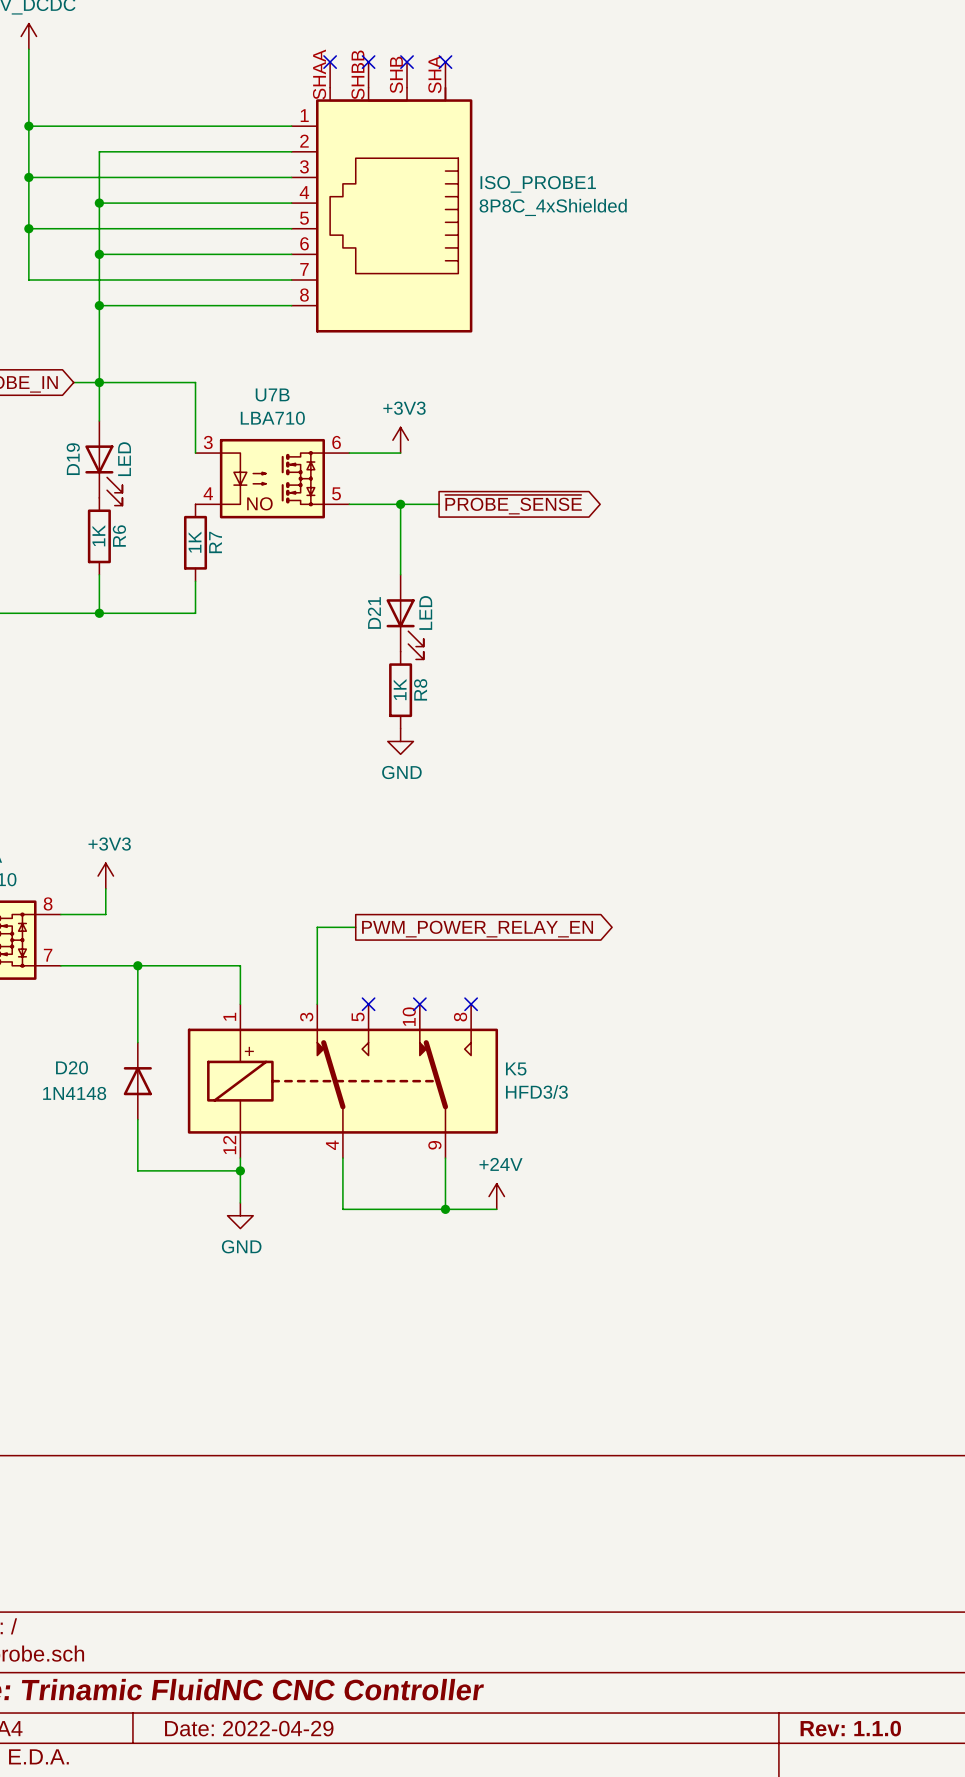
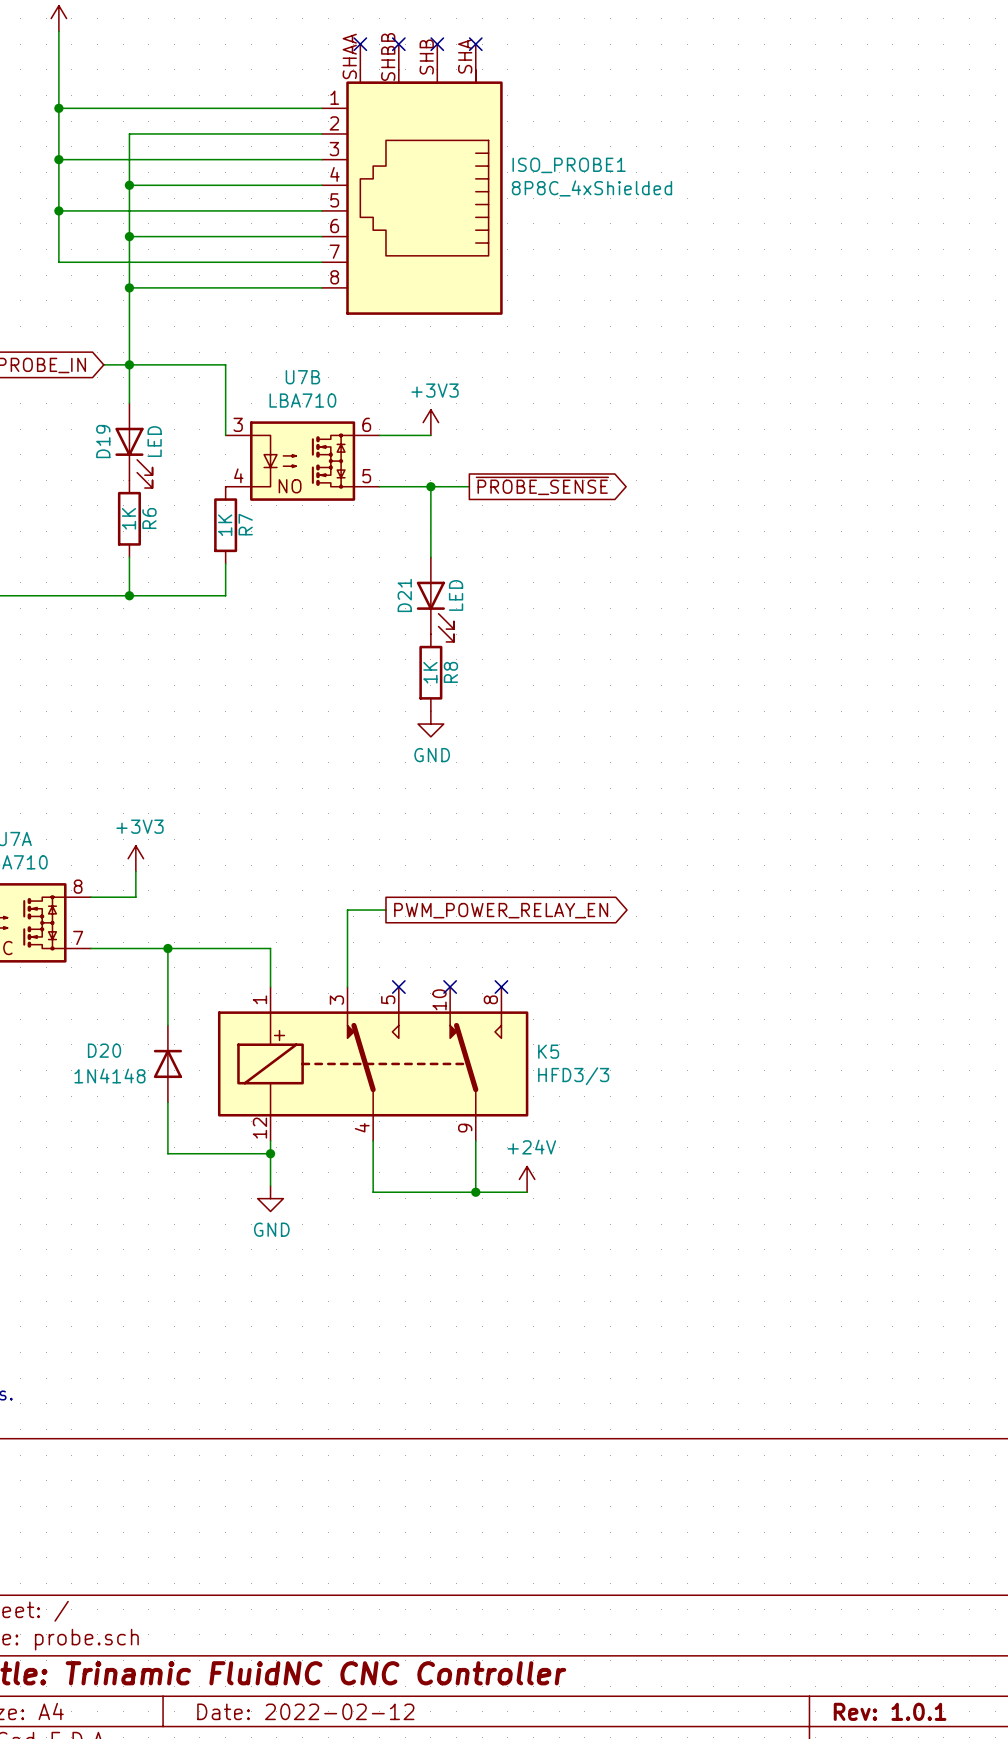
title block: Date: 2022-04-29 (249, 1728) -> Date: 2022-02-12 (305, 1711)
title block: Rev: 1.1.0 (850, 1728) -> Rev: 1.0.1 (890, 1711)

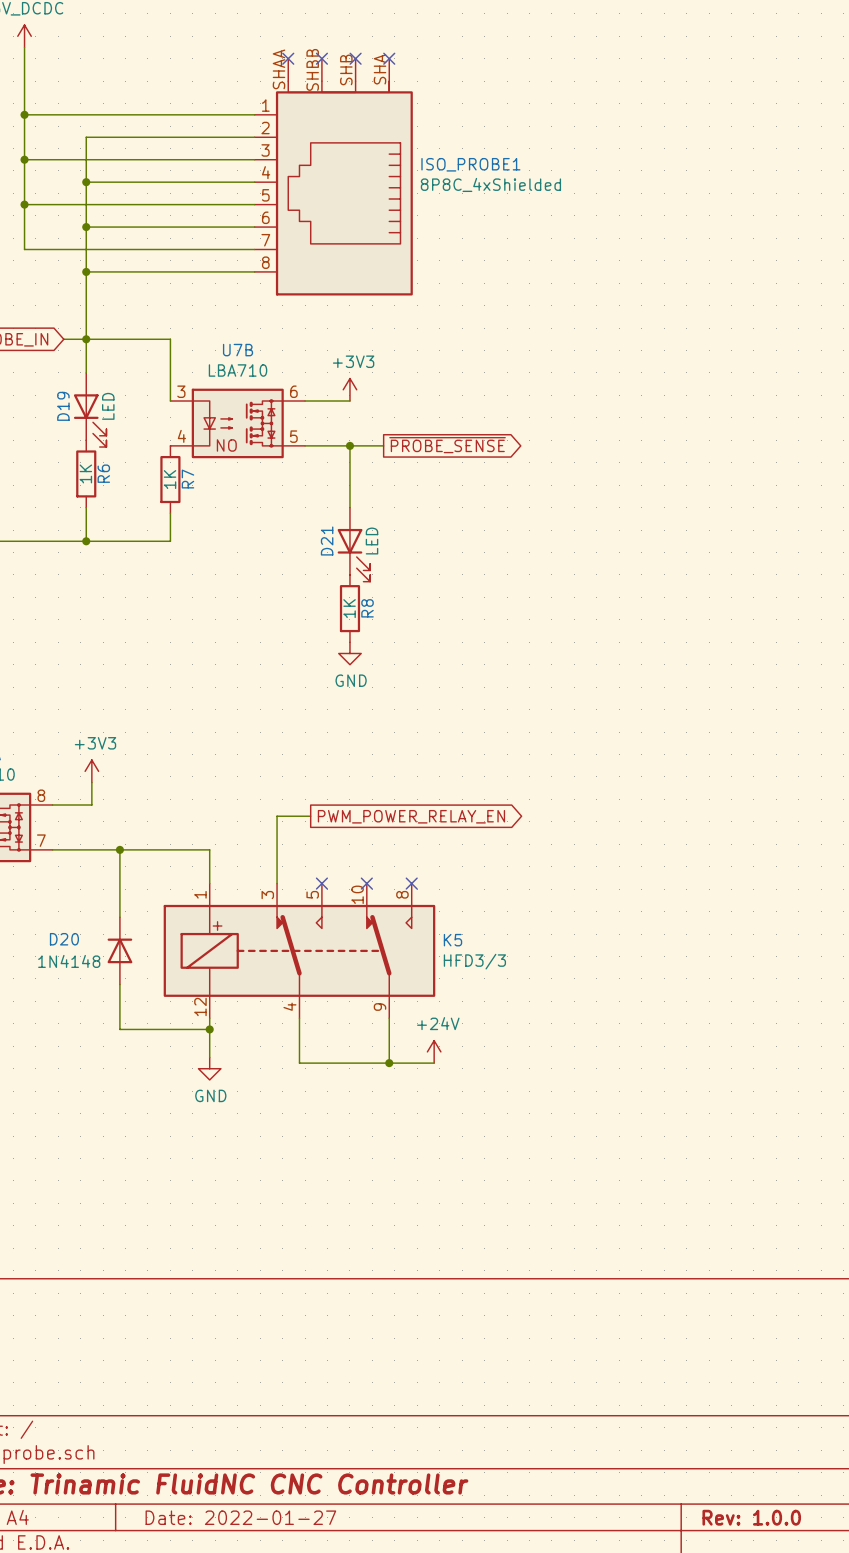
title block: Date: 2022-02-12 (305, 1711) -> Date: 2022-01-27 (240, 1517)
title block: Rev: 1.0.1 (890, 1711) -> Rev: 1.0.0 (751, 1517)

